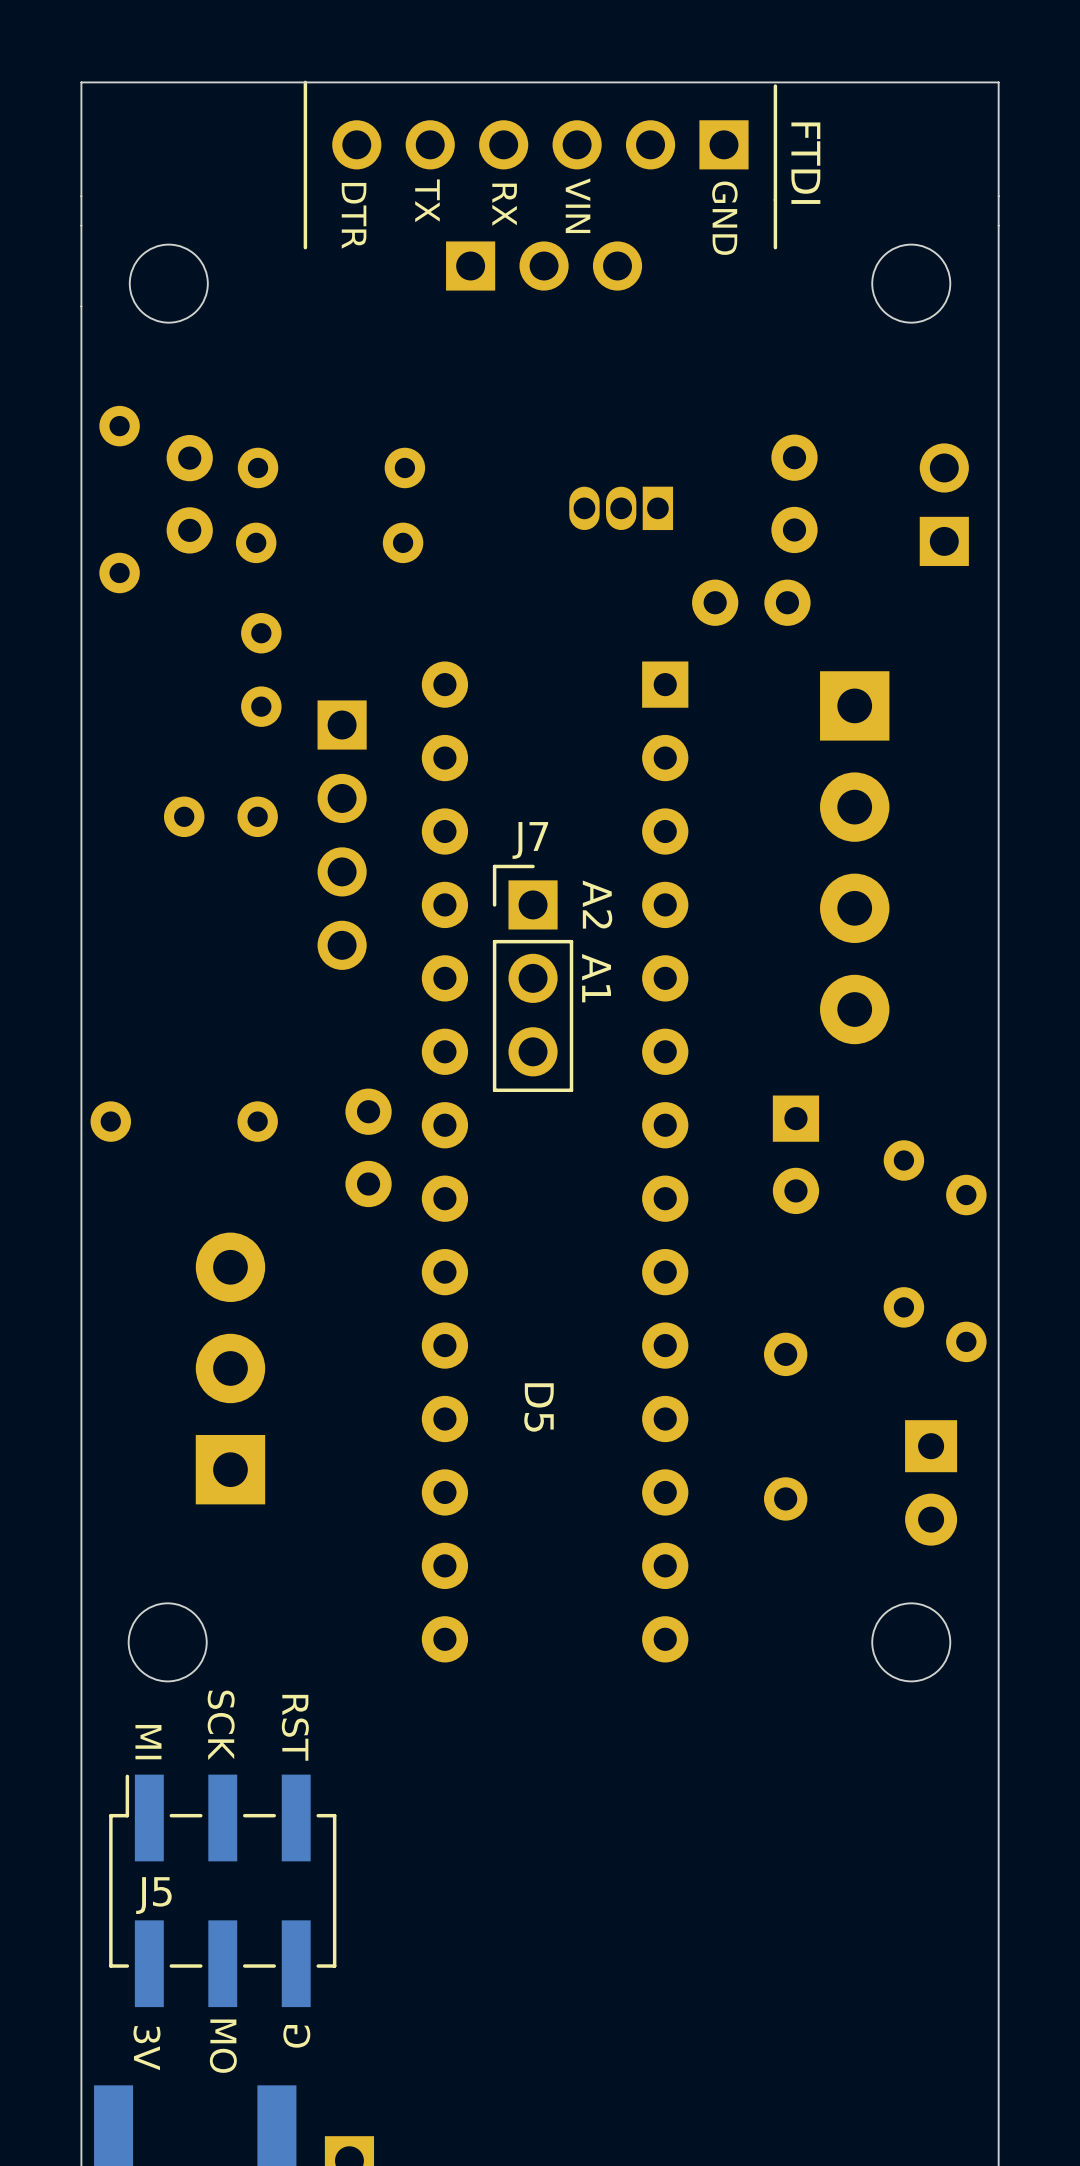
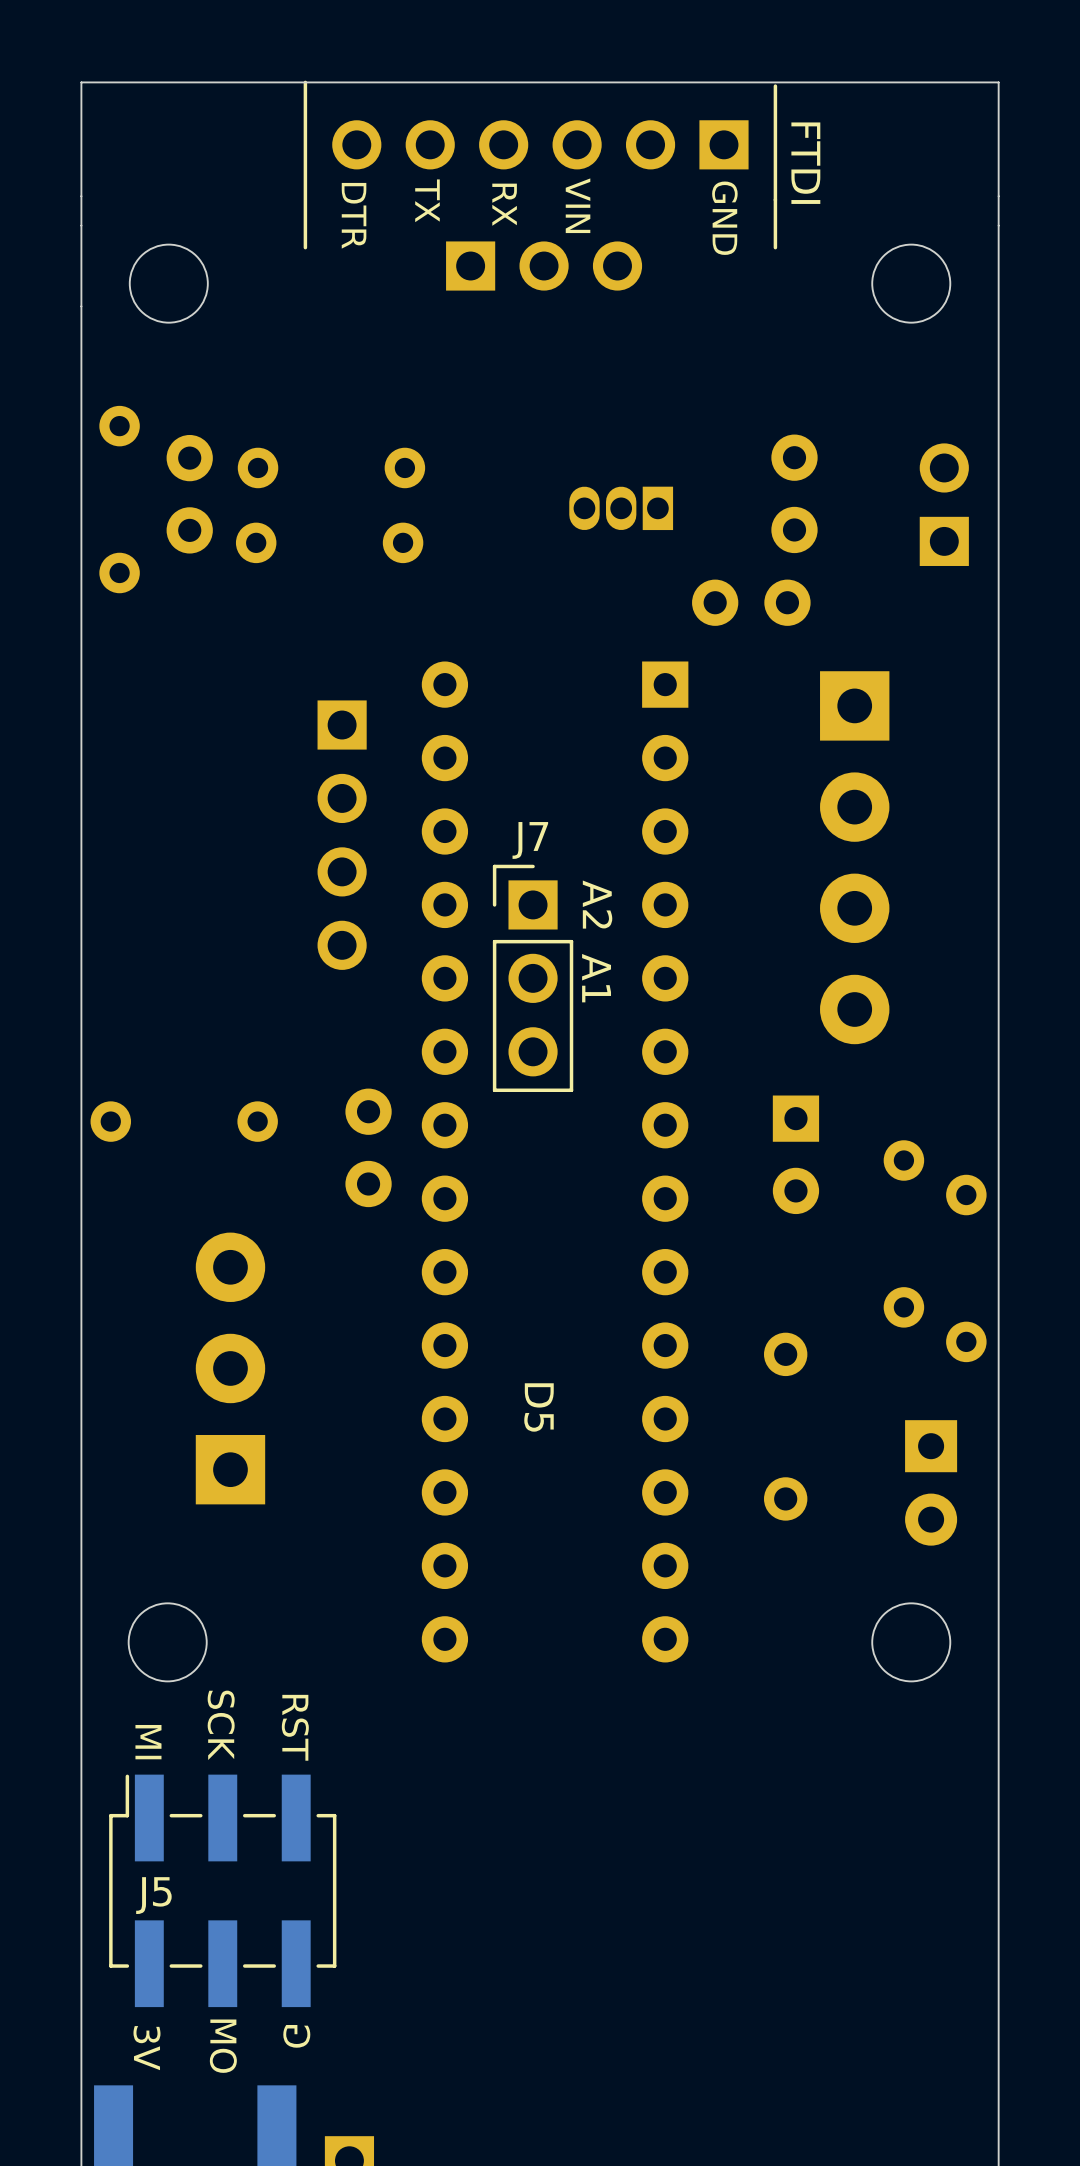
part: (261, 669) -> none
part: (220, 816) -> none

